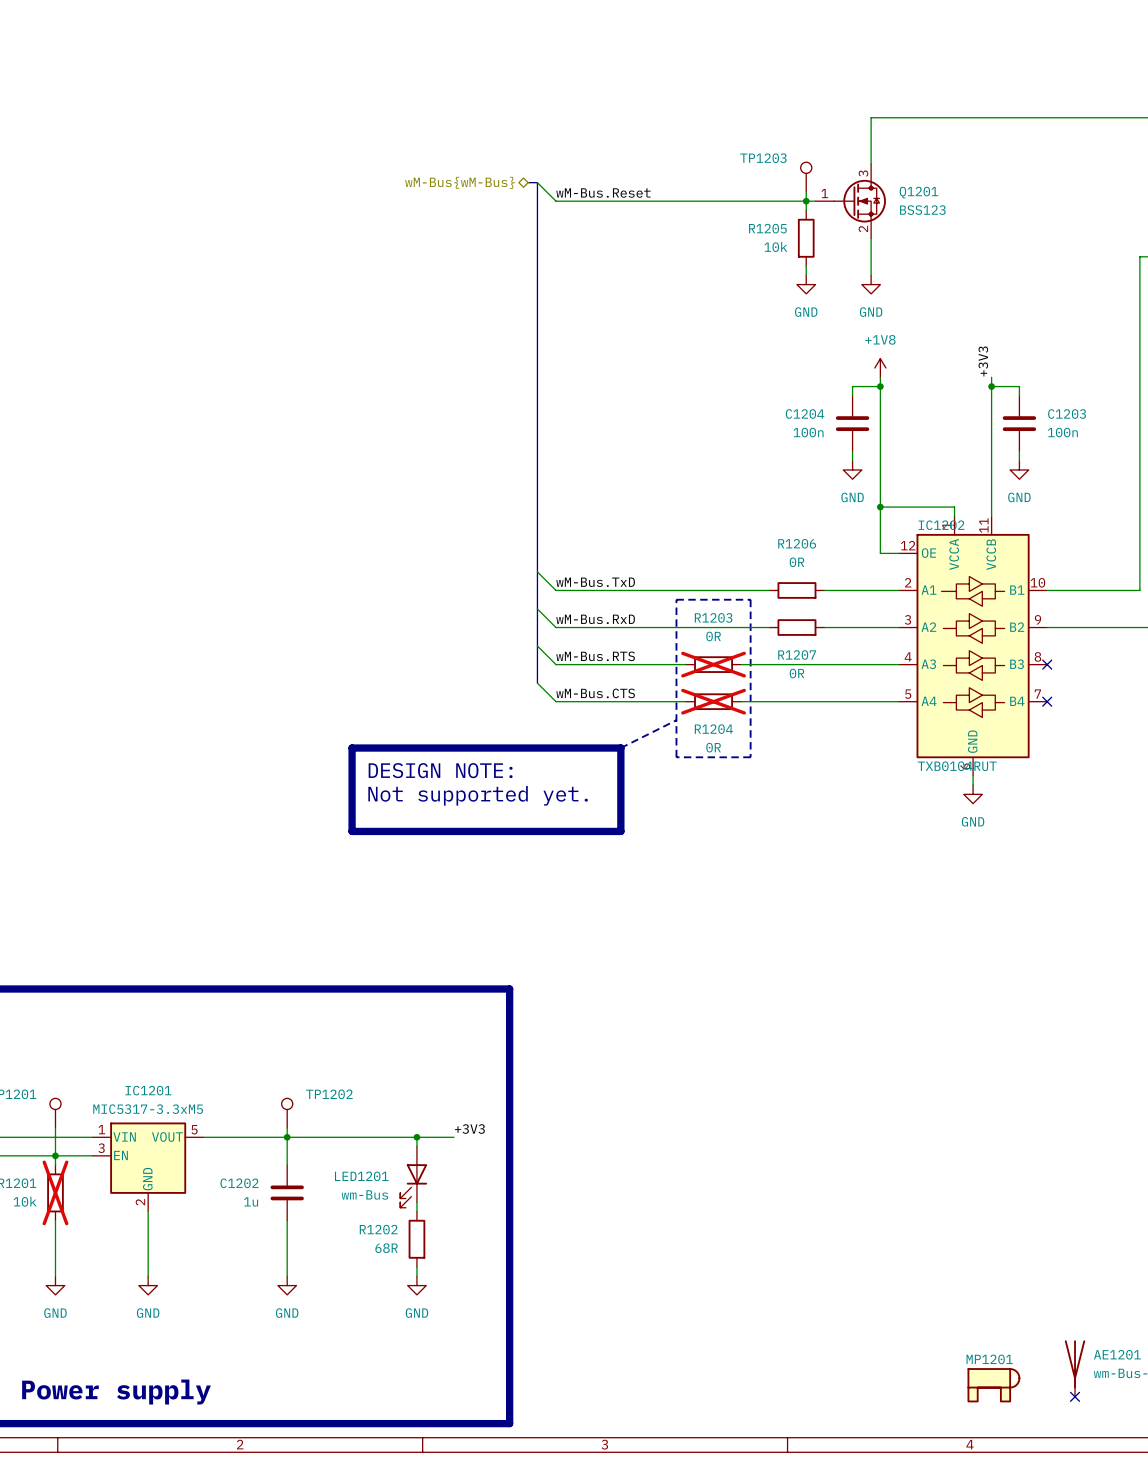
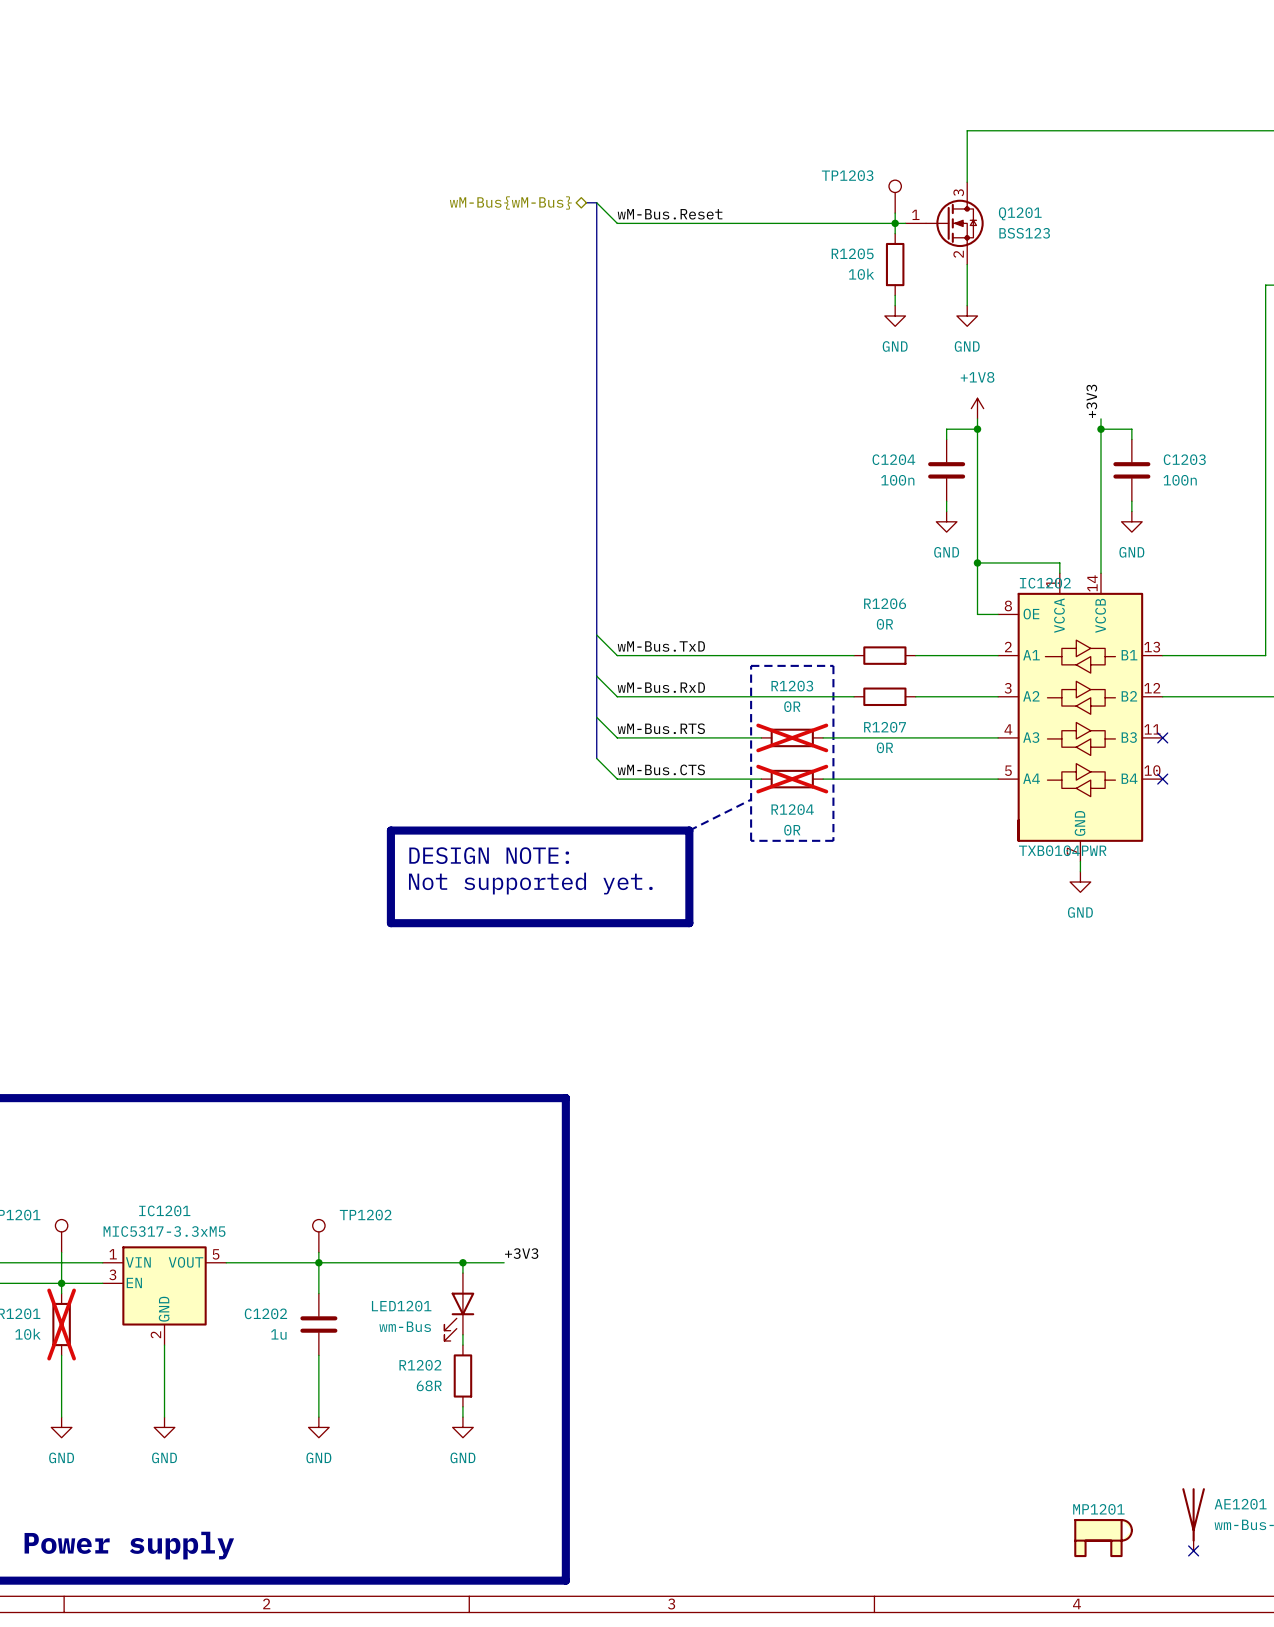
IC1202 symbol: [898, 516, 1048, 776] -> [998, 573, 1163, 862]
IC1202 value: TXB0104RUT (957, 766) -> TXB0104PWR (1062, 850)

